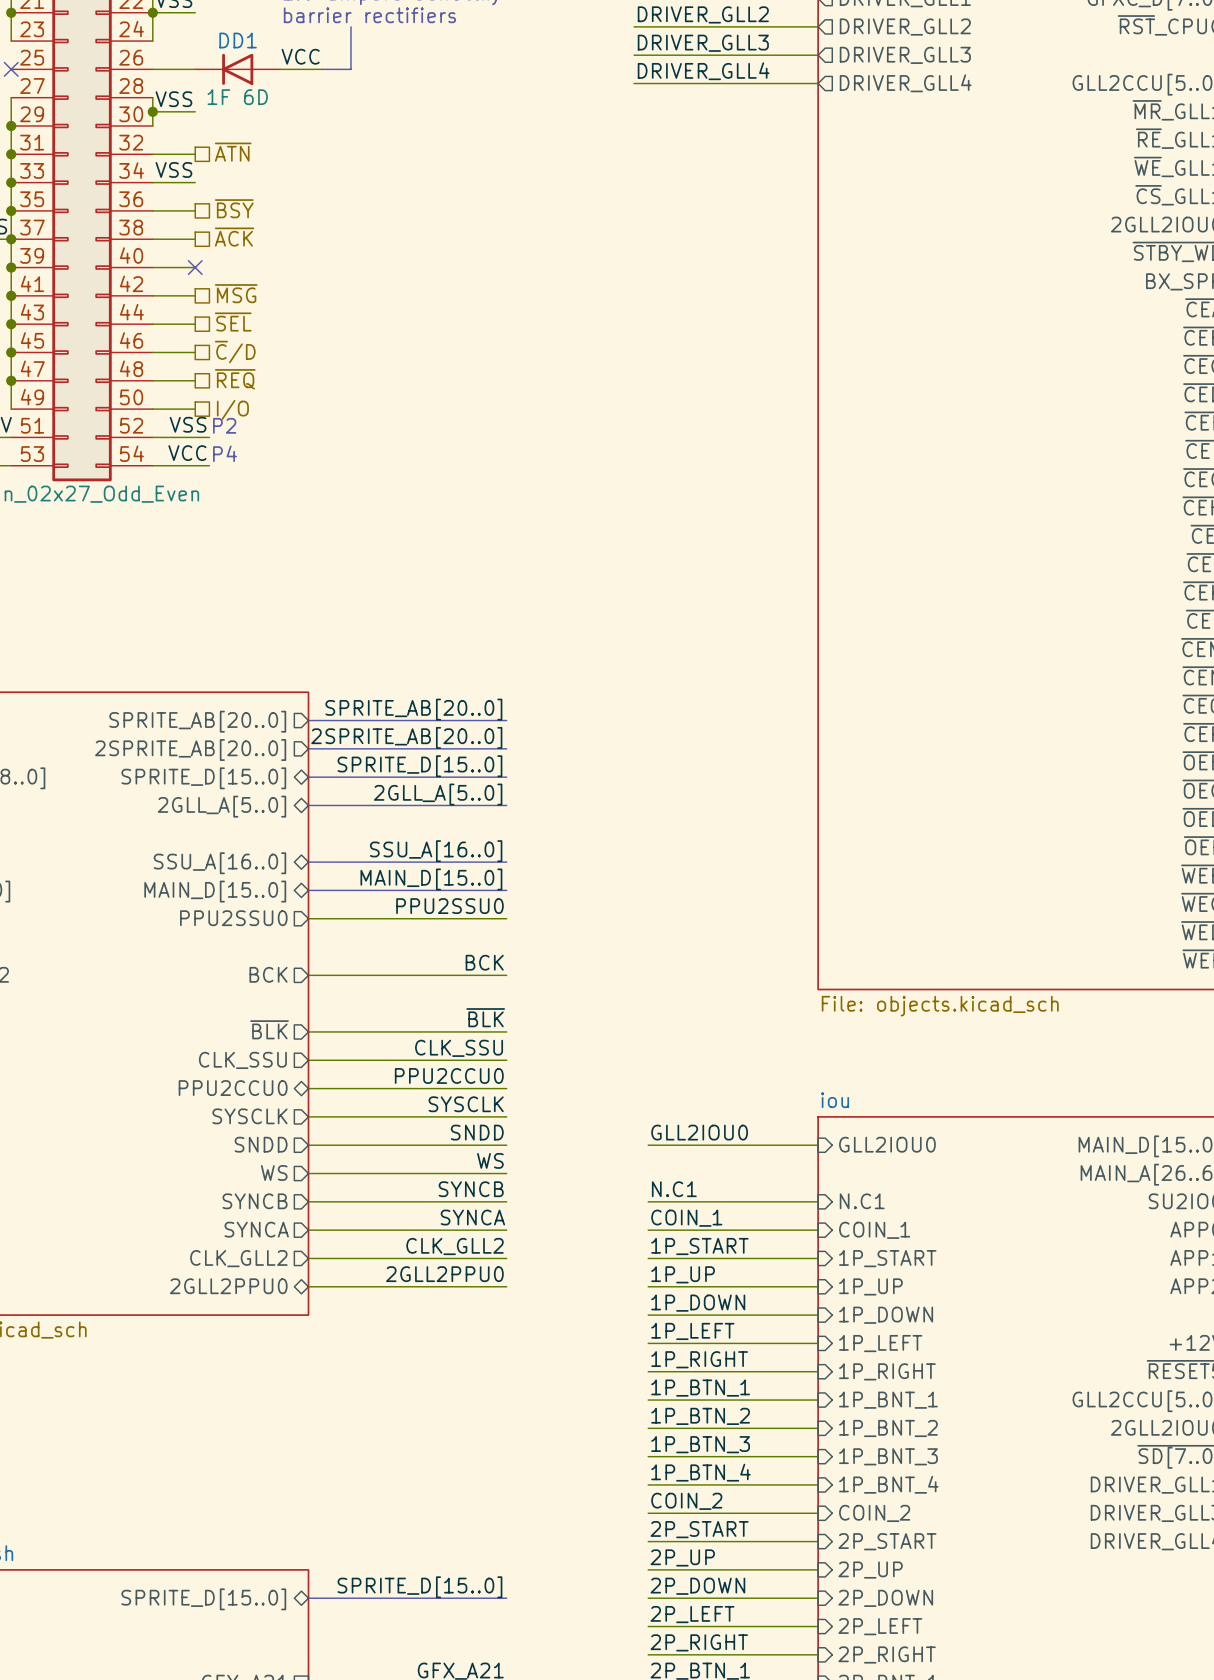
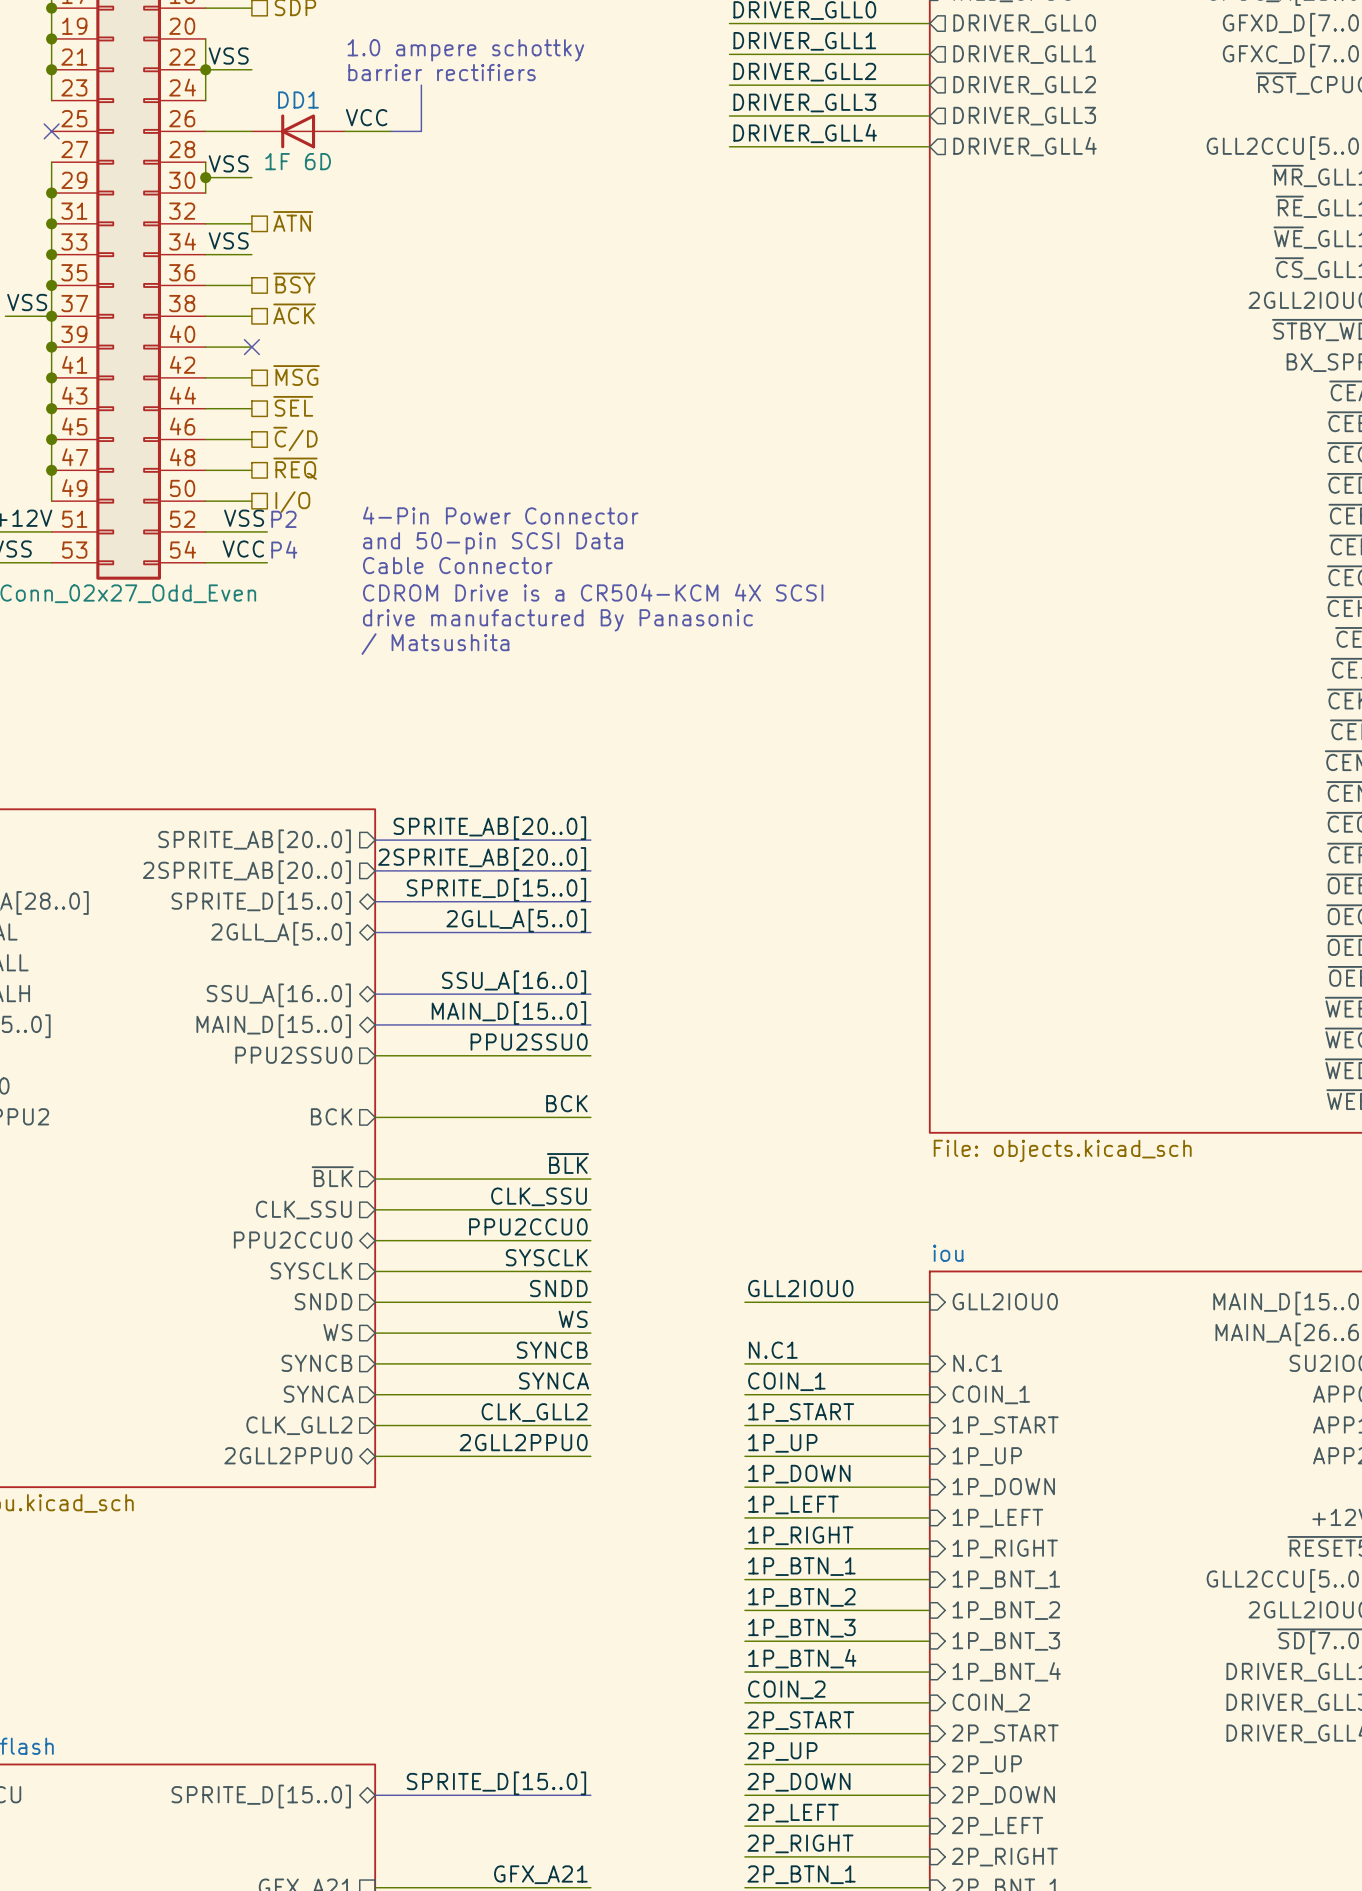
text: none -> 4-Pin Power Connector (500, 515)
text: none -> and 50-pin SCSI Data (493, 543)
text: none -> Cable Connector (457, 565)
text: none -> CDROM Drive is a CR504-KCM 4X SCSI (593, 592)
text: none -> drive manufactured By Panasonic (557, 620)
text: none -> / Matsushita (435, 644)

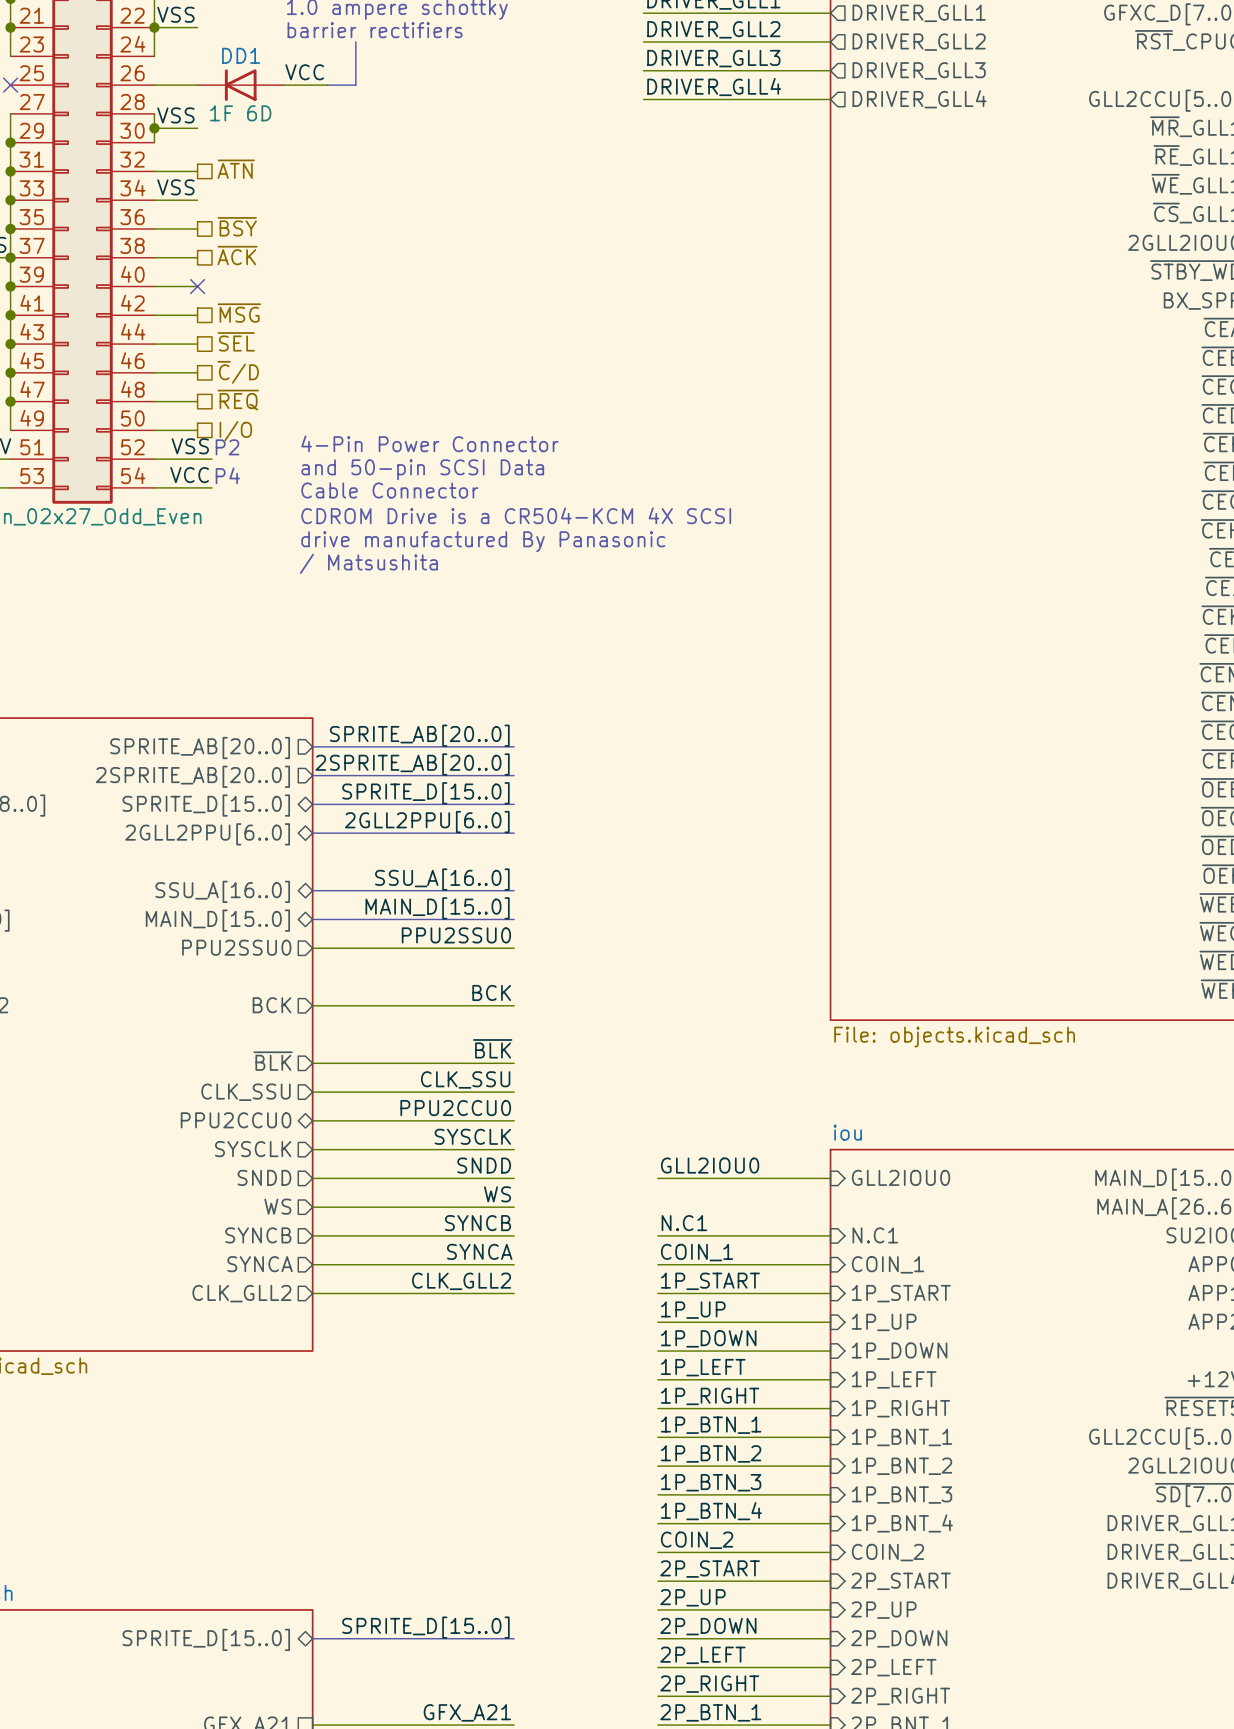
label: 2GLL_A[5..0] (516, 920) -> 2GLL2PPU[6..0] (427, 822)
sheet pin: 2GLL_A[5..0] (281, 933) -> 2GLL2PPU[6..0] (207, 834)
label: 2GLL2PPU0 (523, 1442) -> none
sheet pin: 2GLL2PPU0 (288, 1455) -> none
wire: (375, 1456) (590, 1456) -> none

